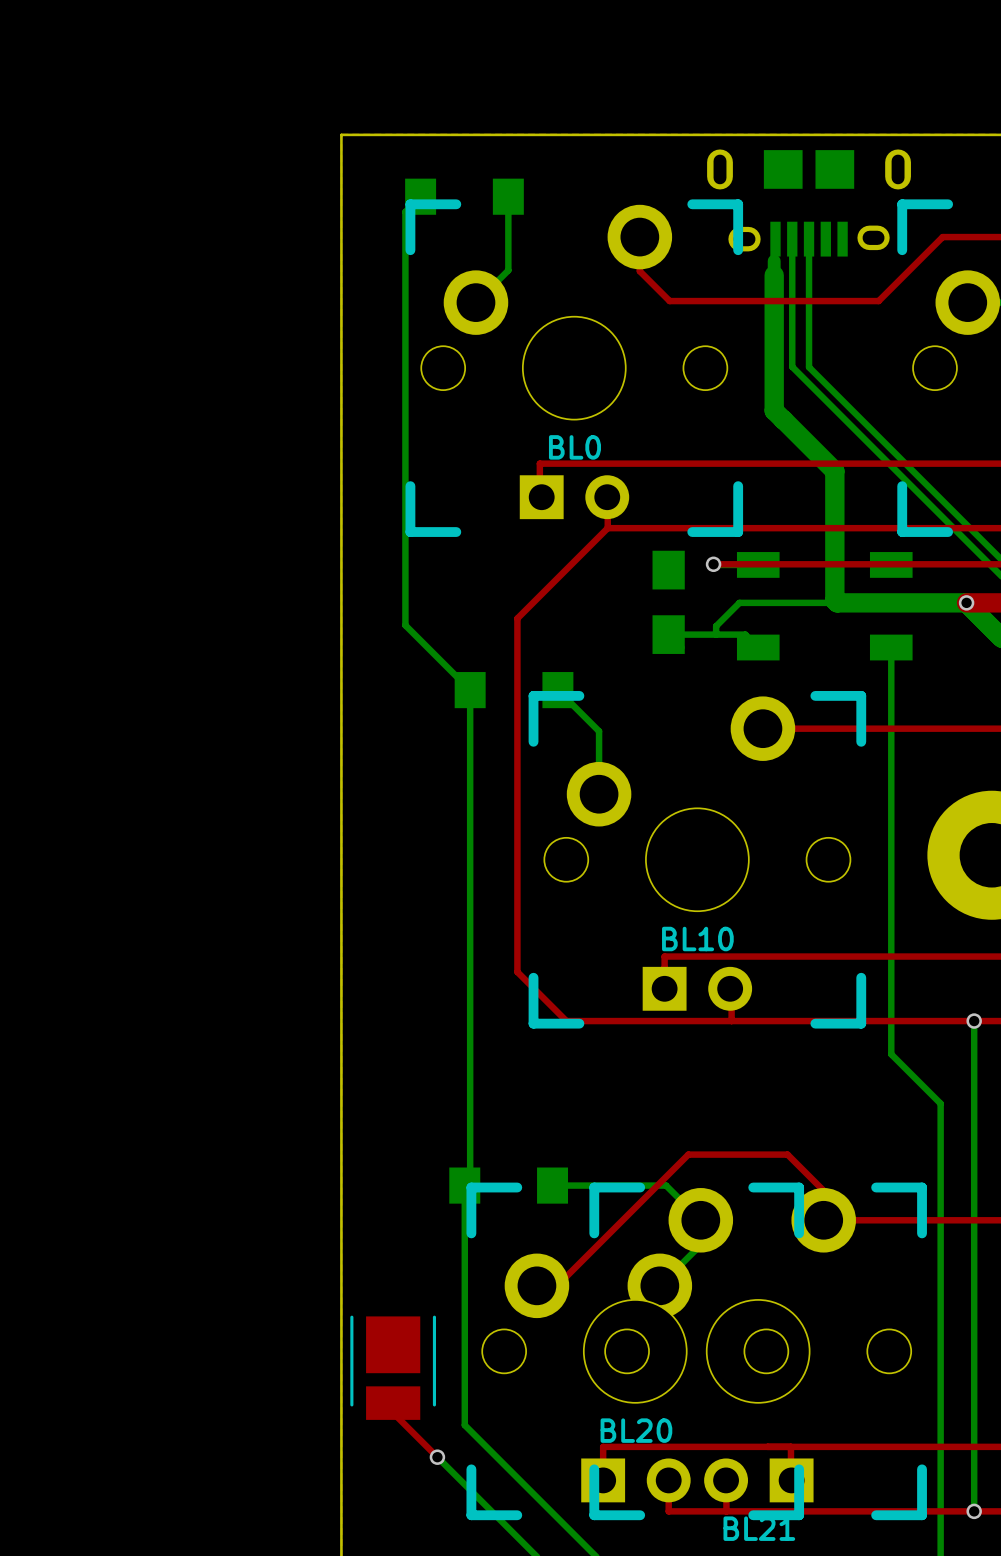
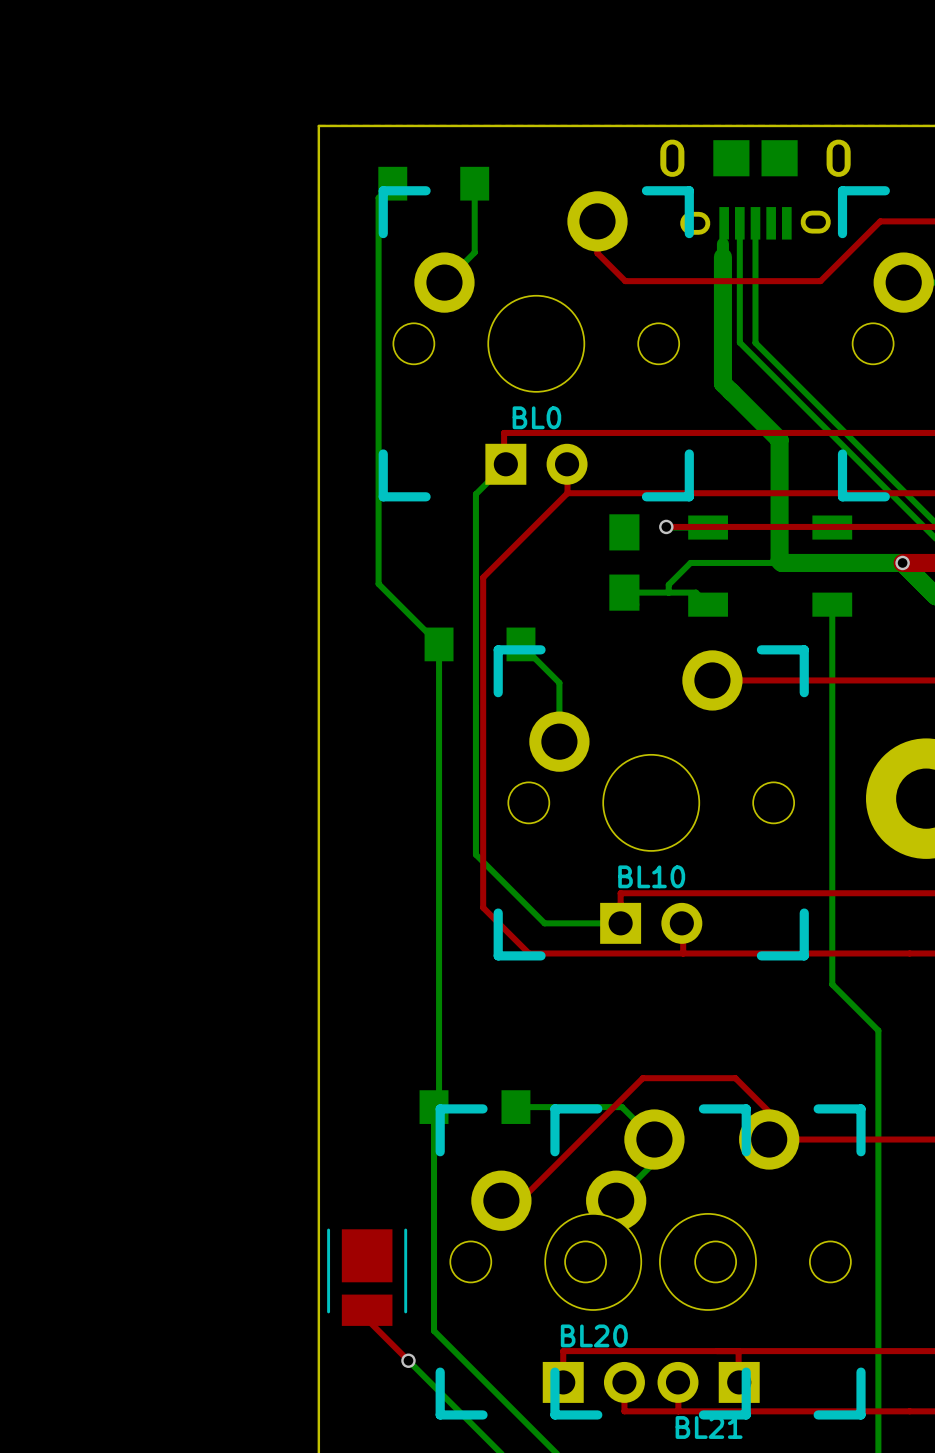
bottom track: none -> (505, 464) (475, 494) (475, 854) (544, 923) (620, 923)
bottom track: (974, 1021) (974, 1511) -> none
via: (974, 1021) -> none
via: (974, 1511) -> none

